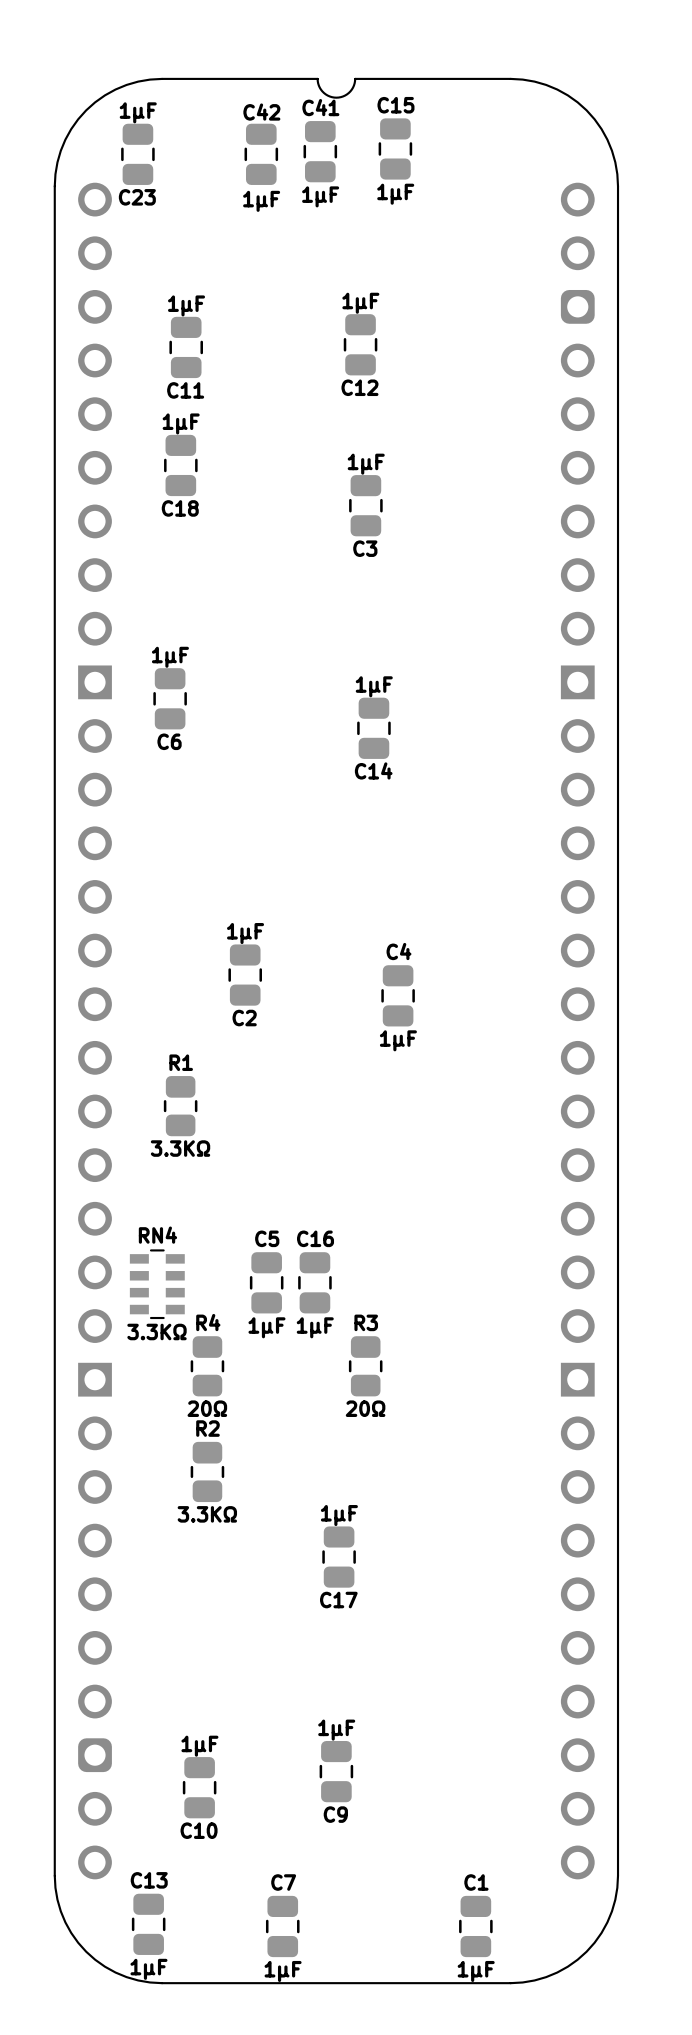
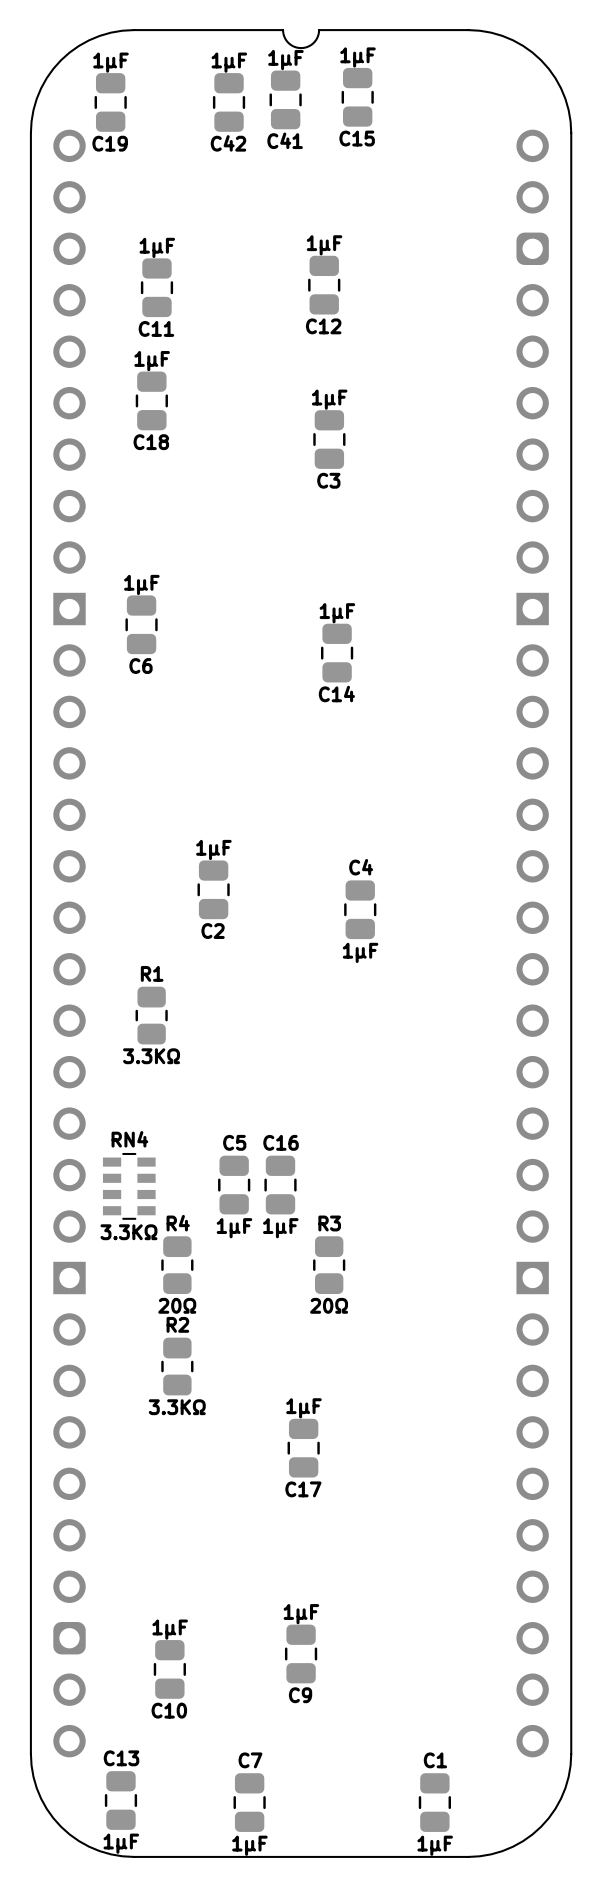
C15 name position: C15 (395, 105) -> C15 (357, 138)
C41 name position: C41 (320, 107) -> C41 (285, 140)
C42 name position: C42 (261, 112) -> C42 (228, 143)
C15 value position: 1μF (395, 194) -> 1μF (357, 57)
C41 value position: 1μF (320, 196) -> 1μF (285, 60)
C23 name: C23 (137, 197) -> C19 (110, 143)
C42 value position: 1μF (261, 201) -> 1μF (229, 62)

